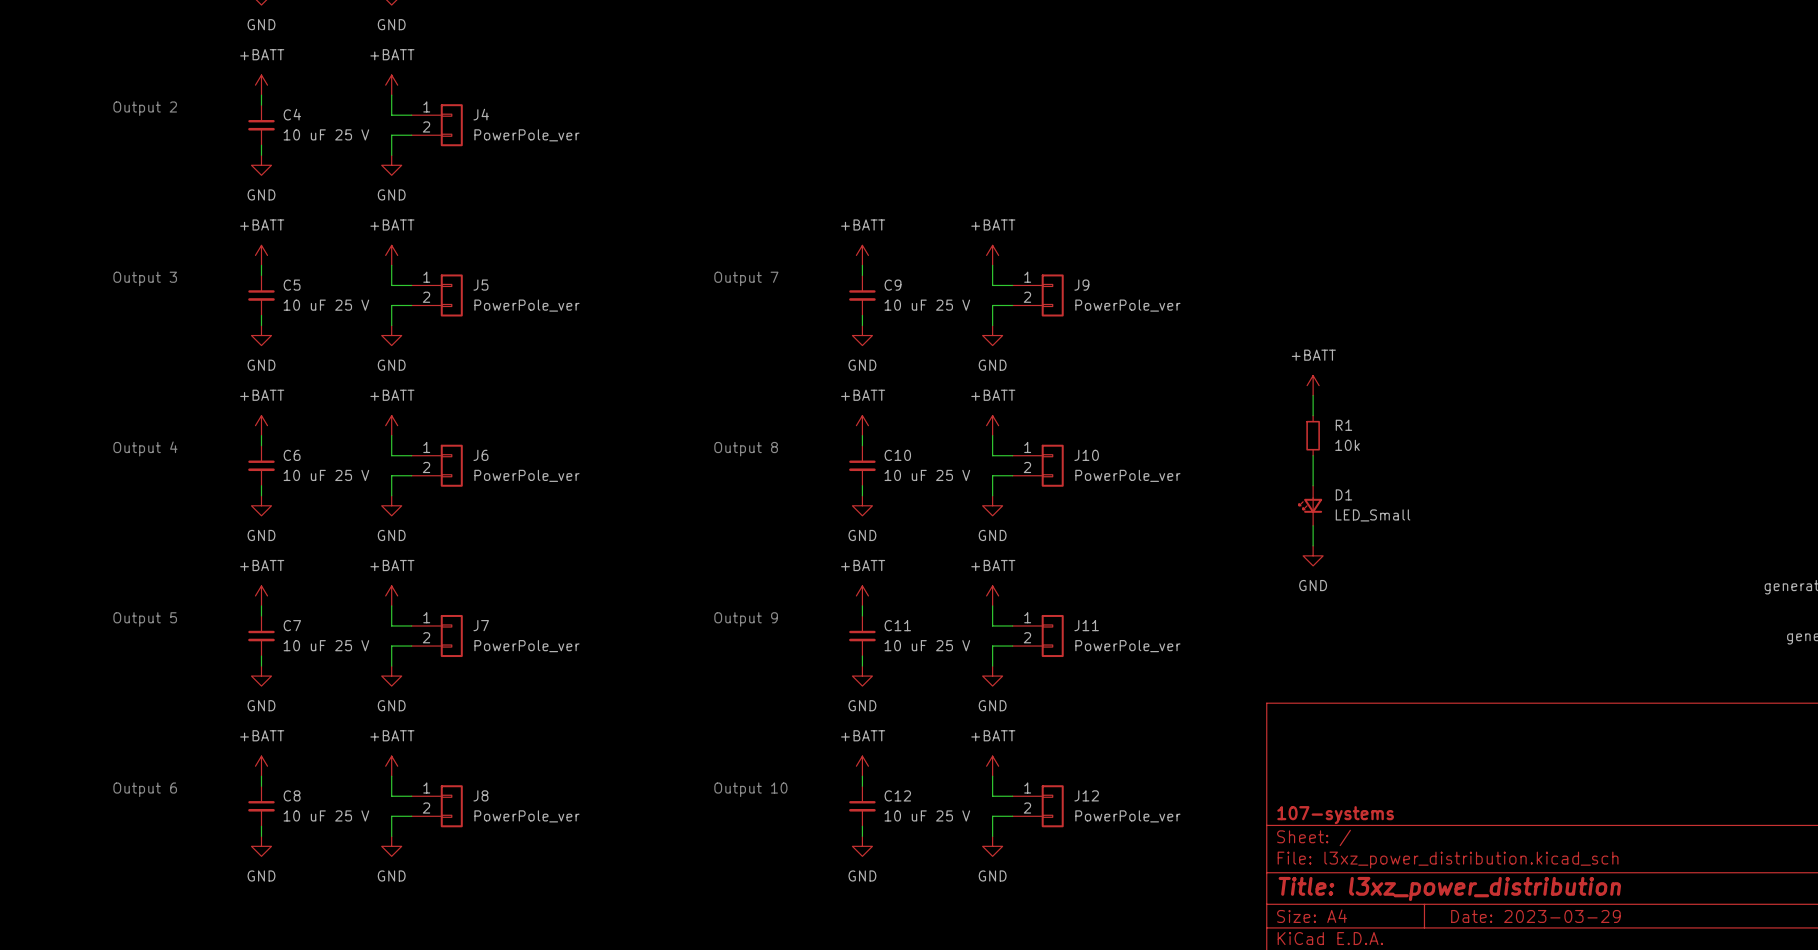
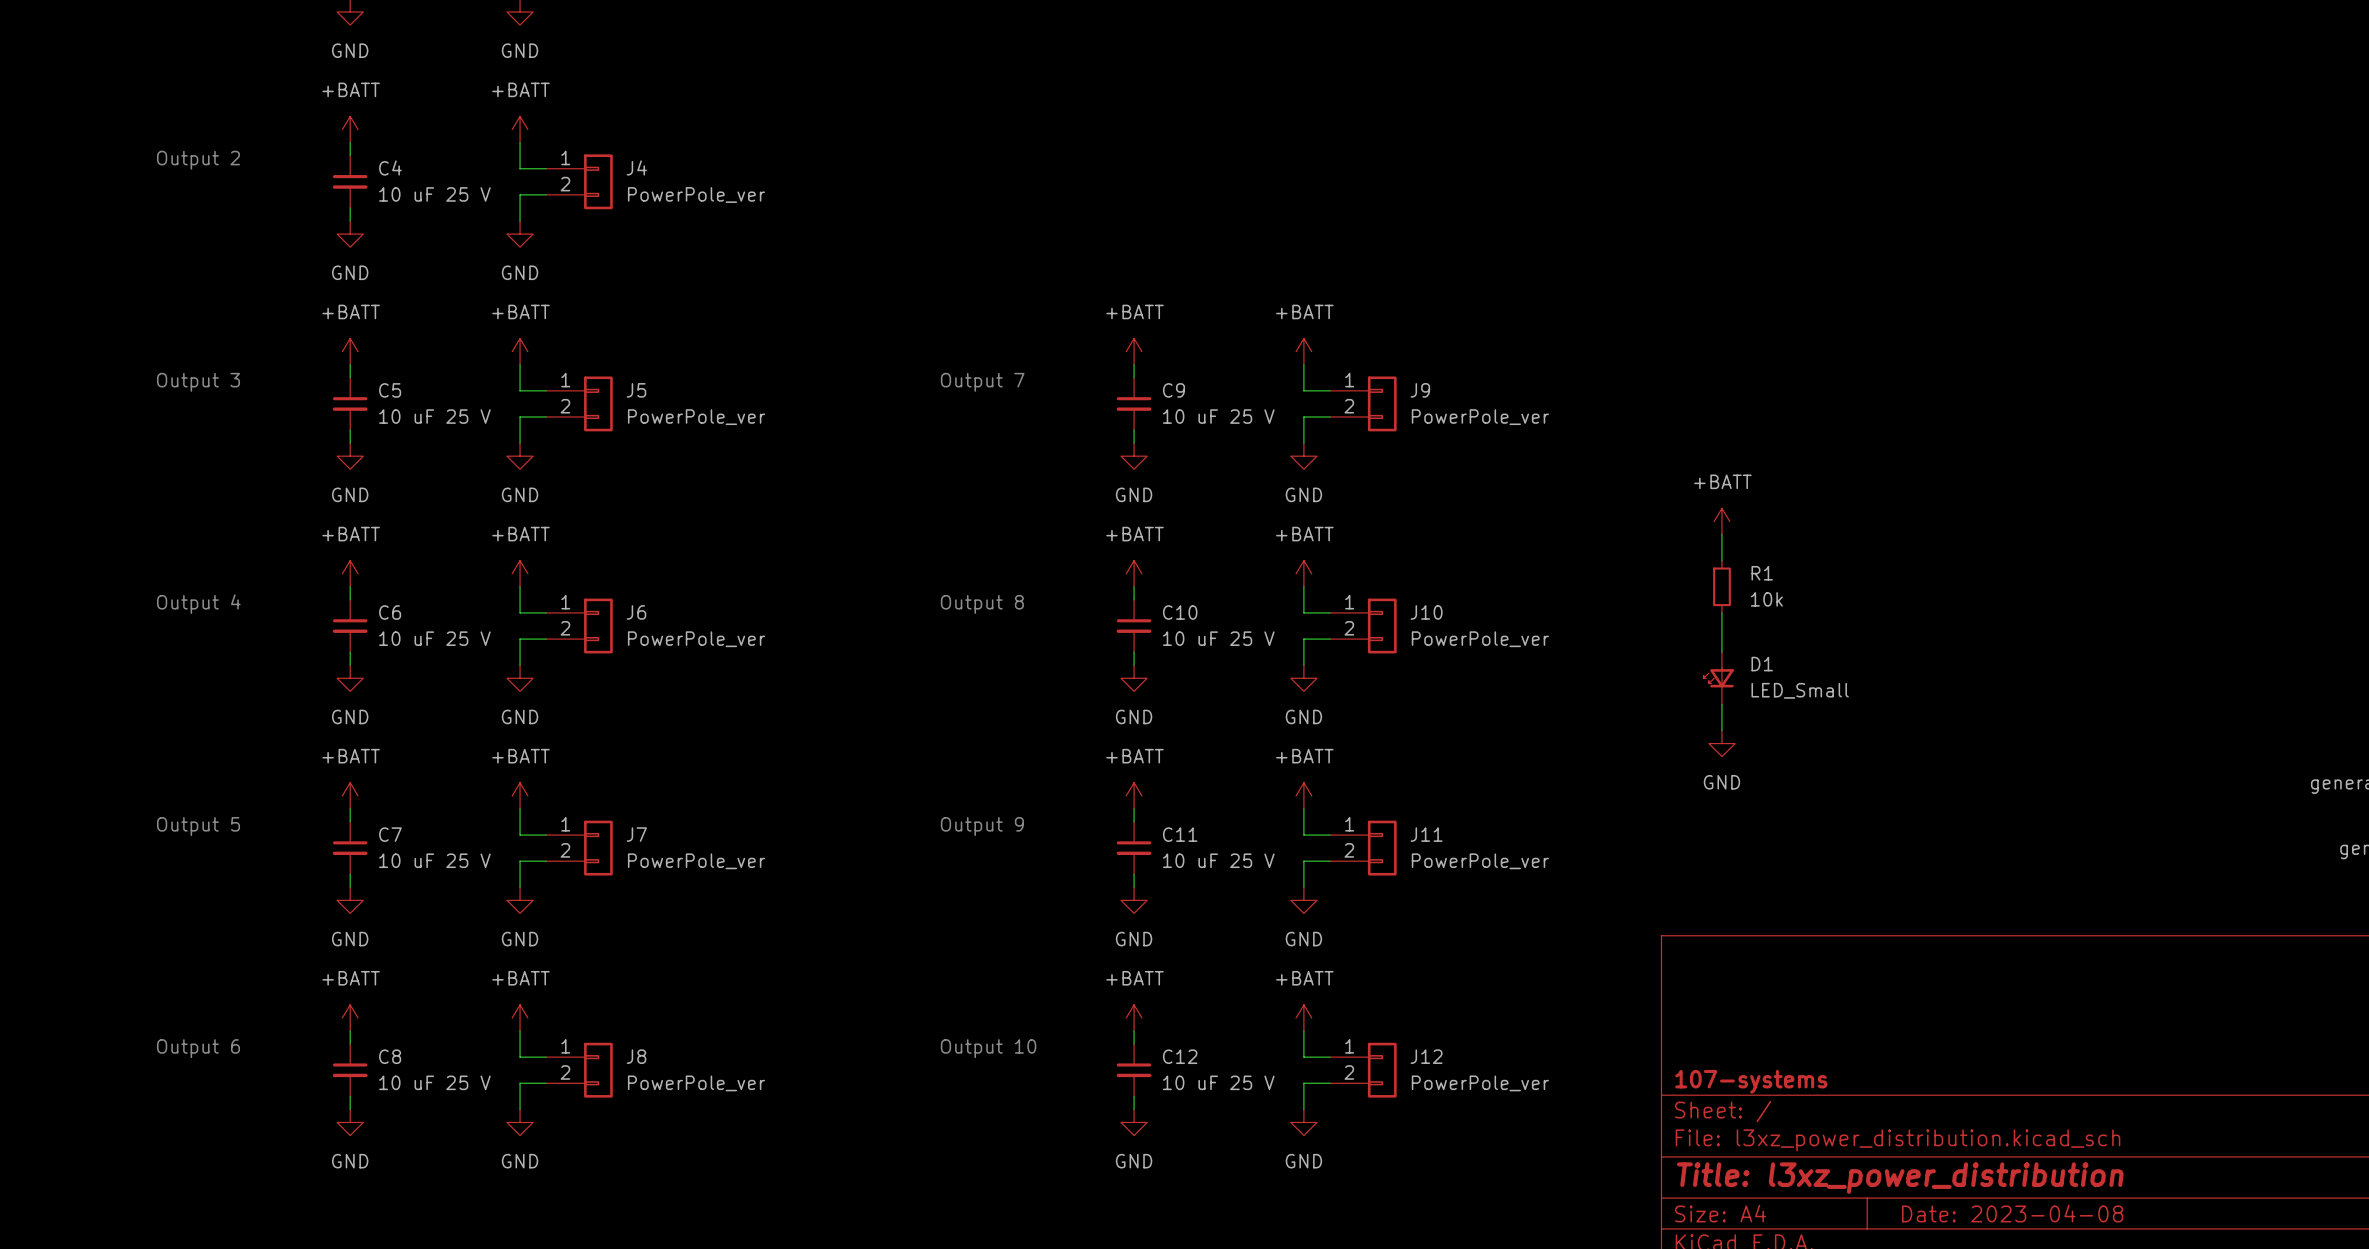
title block: Date: 2023-03-29 (1535, 916) -> Date: 2023-04-08 (2012, 1213)

